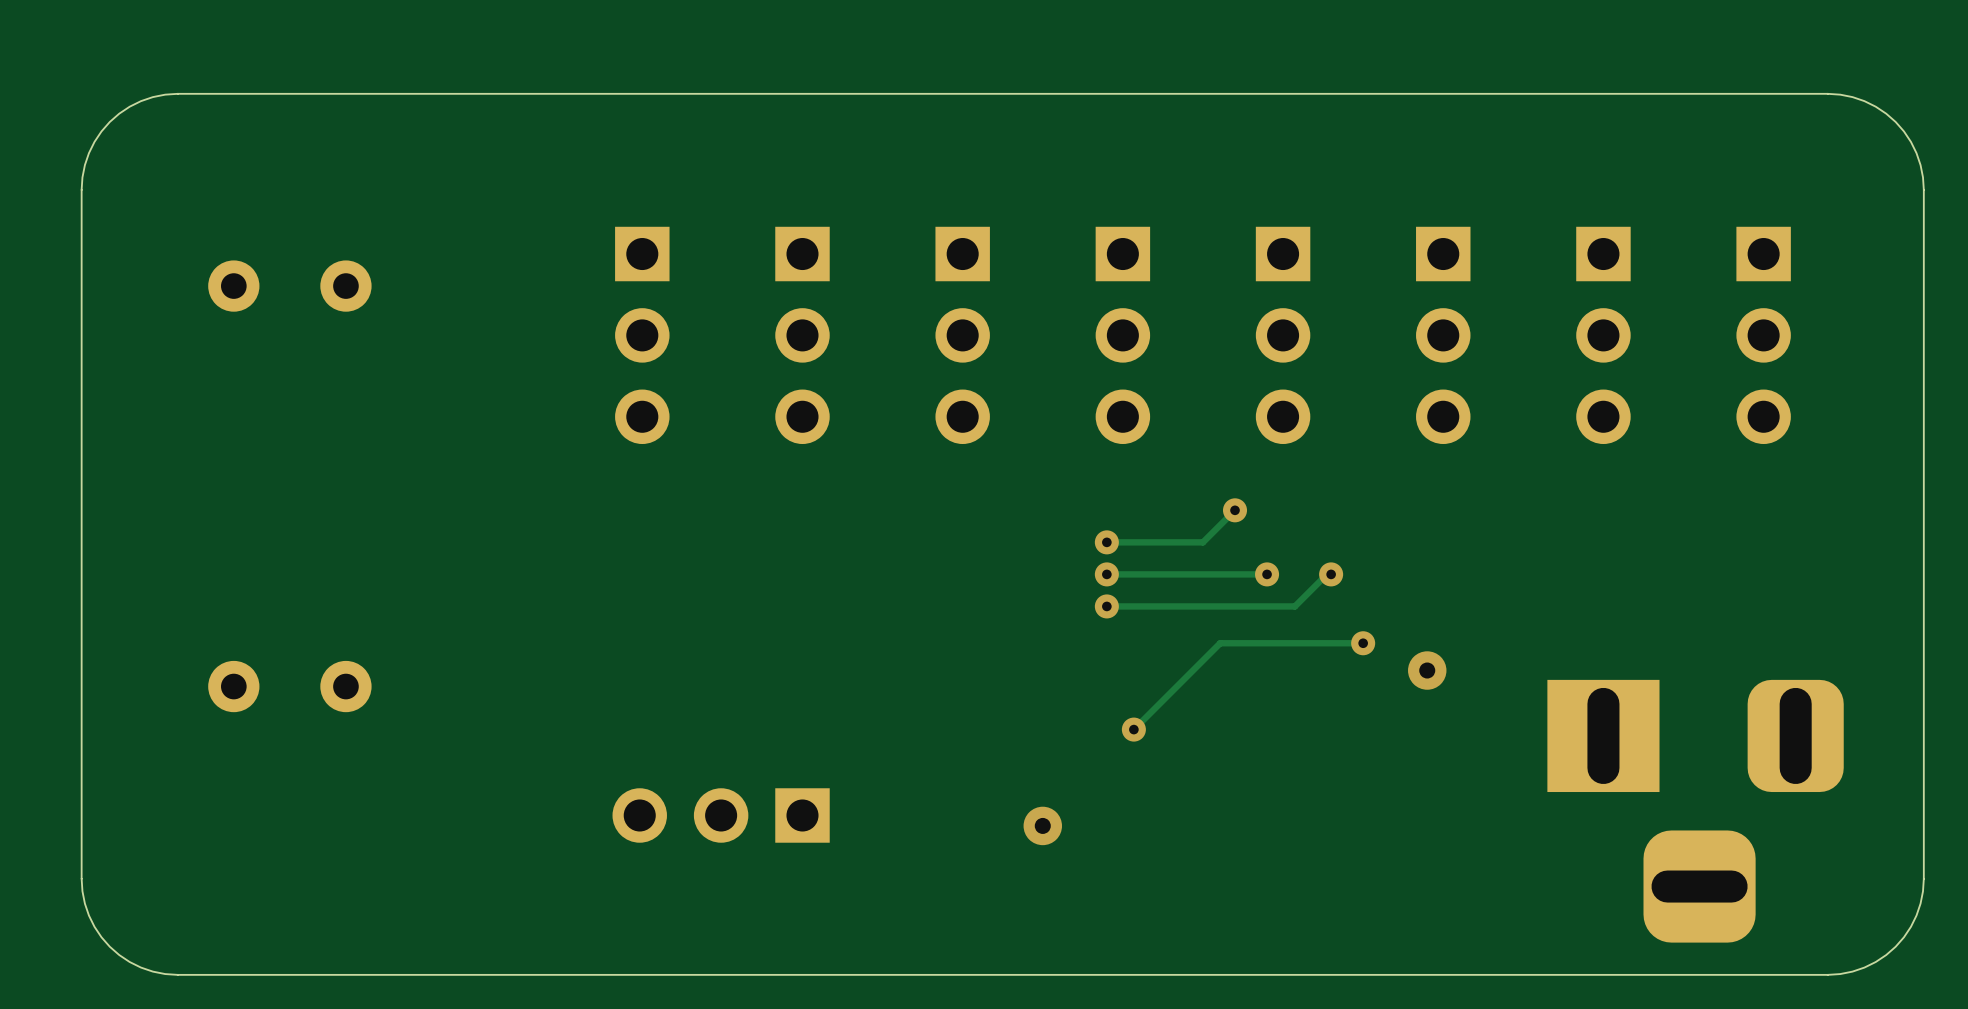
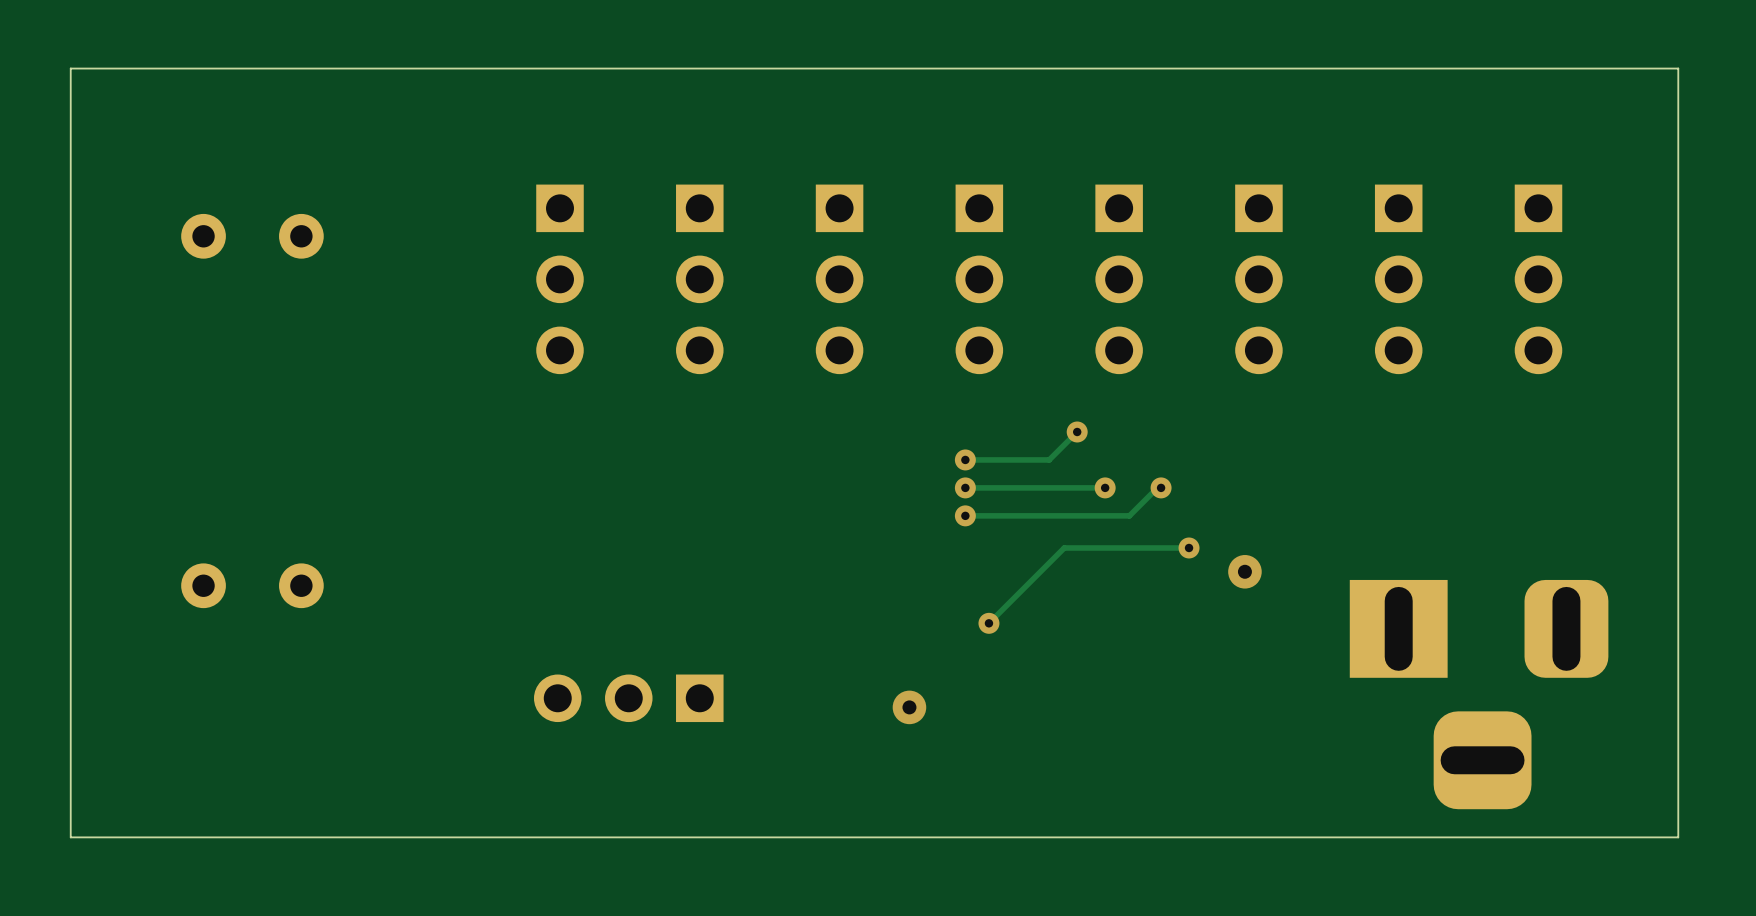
board edge: (177, 93) (152, 97) (140, 101) (129, 106) (109, 121) (101, 131) (88, 153) (84, 165) (81, 189) -> (154, 68) (70, 68) (70, 152)
board edge: (1827, 93) (1852, 97) (1864, 101) (1875, 106) (1895, 121) (1903, 131) (1916, 153) (1923, 177) (1923, 189) -> (1594, 68) (1678, 68) (1678, 152)
board edge: (81, 878) (84, 903) (88, 915) (94, 926) (109, 946) (129, 962) (140, 967) (152, 971) (177, 974) -> (70, 753) (70, 837) (154, 837)
board edge: (1923, 878) (1923, 891) (1916, 915) (1910, 926) (1895, 946) (1875, 962) (1864, 967) (1852, 971) (1827, 974) -> (1678, 753) (1678, 837) (1594, 837)

